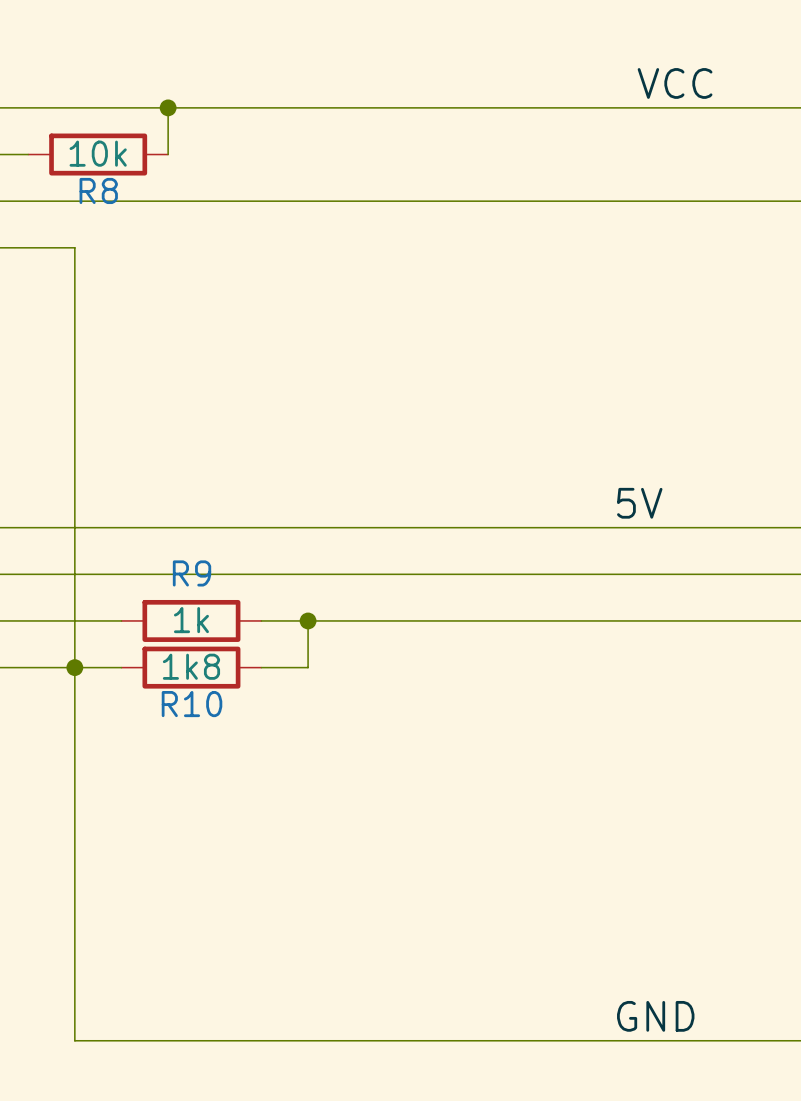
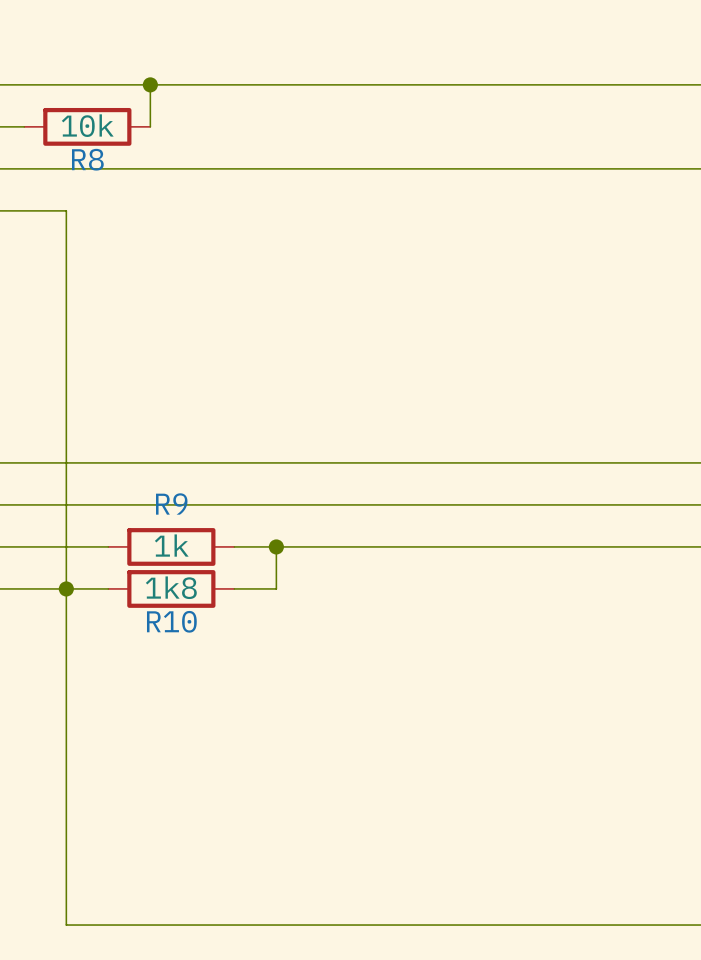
label: VCC (675, 83) -> none
label: 5V (639, 503) -> none
label: GND (655, 1016) -> none

